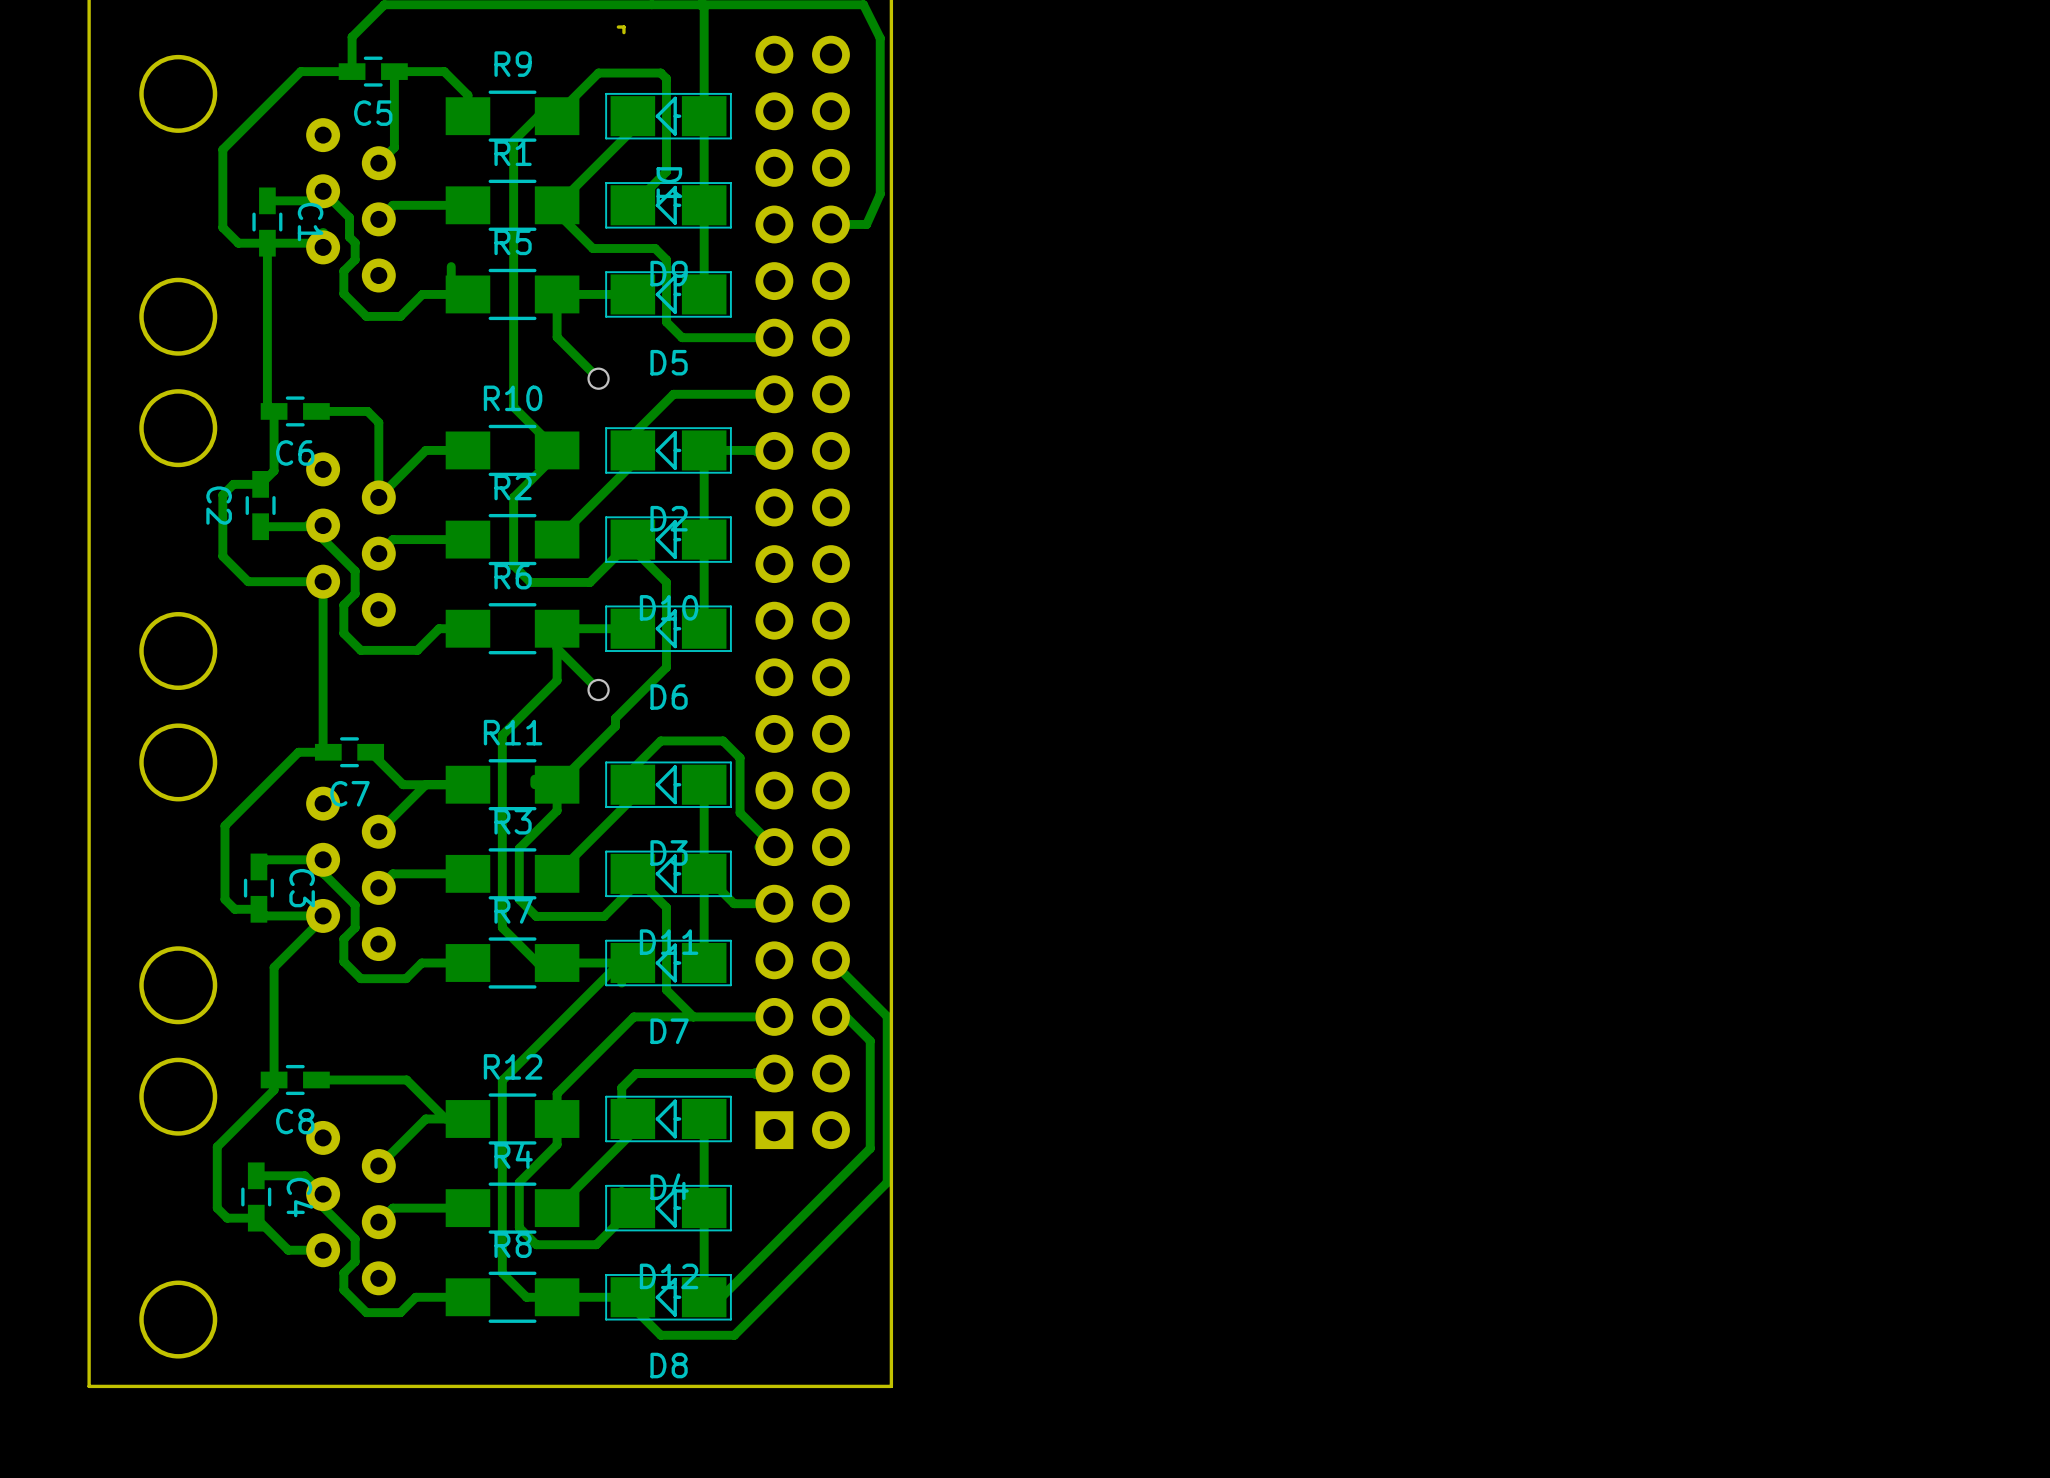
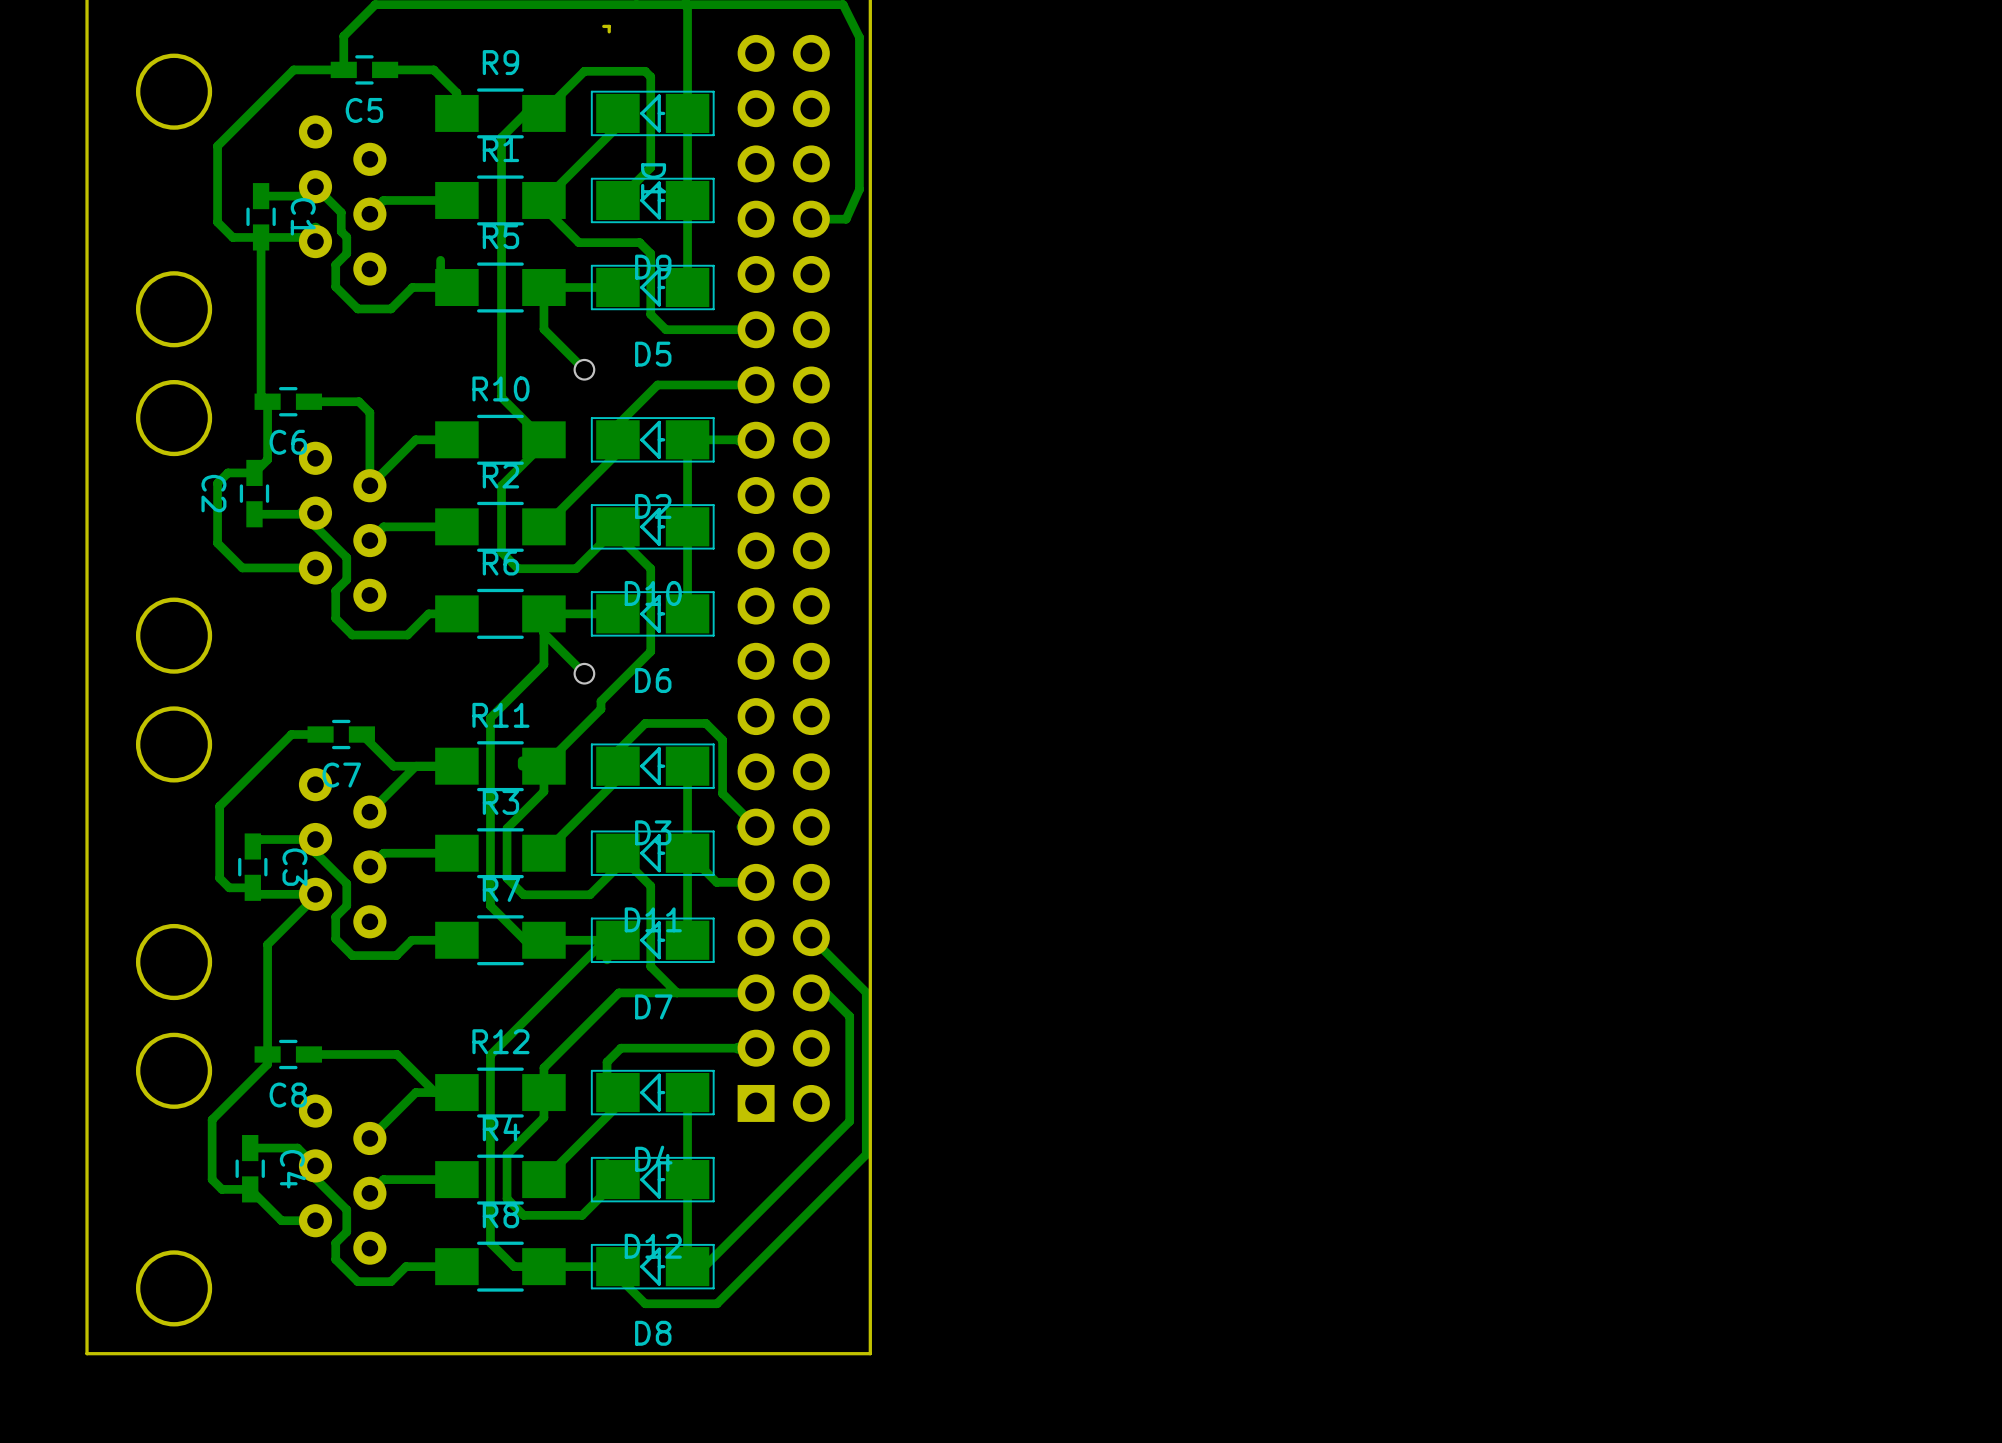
track: (394, 71) (394, 147) (378, 163) -> none
track: (323, 581) (323, 747) (328, 752) -> none

